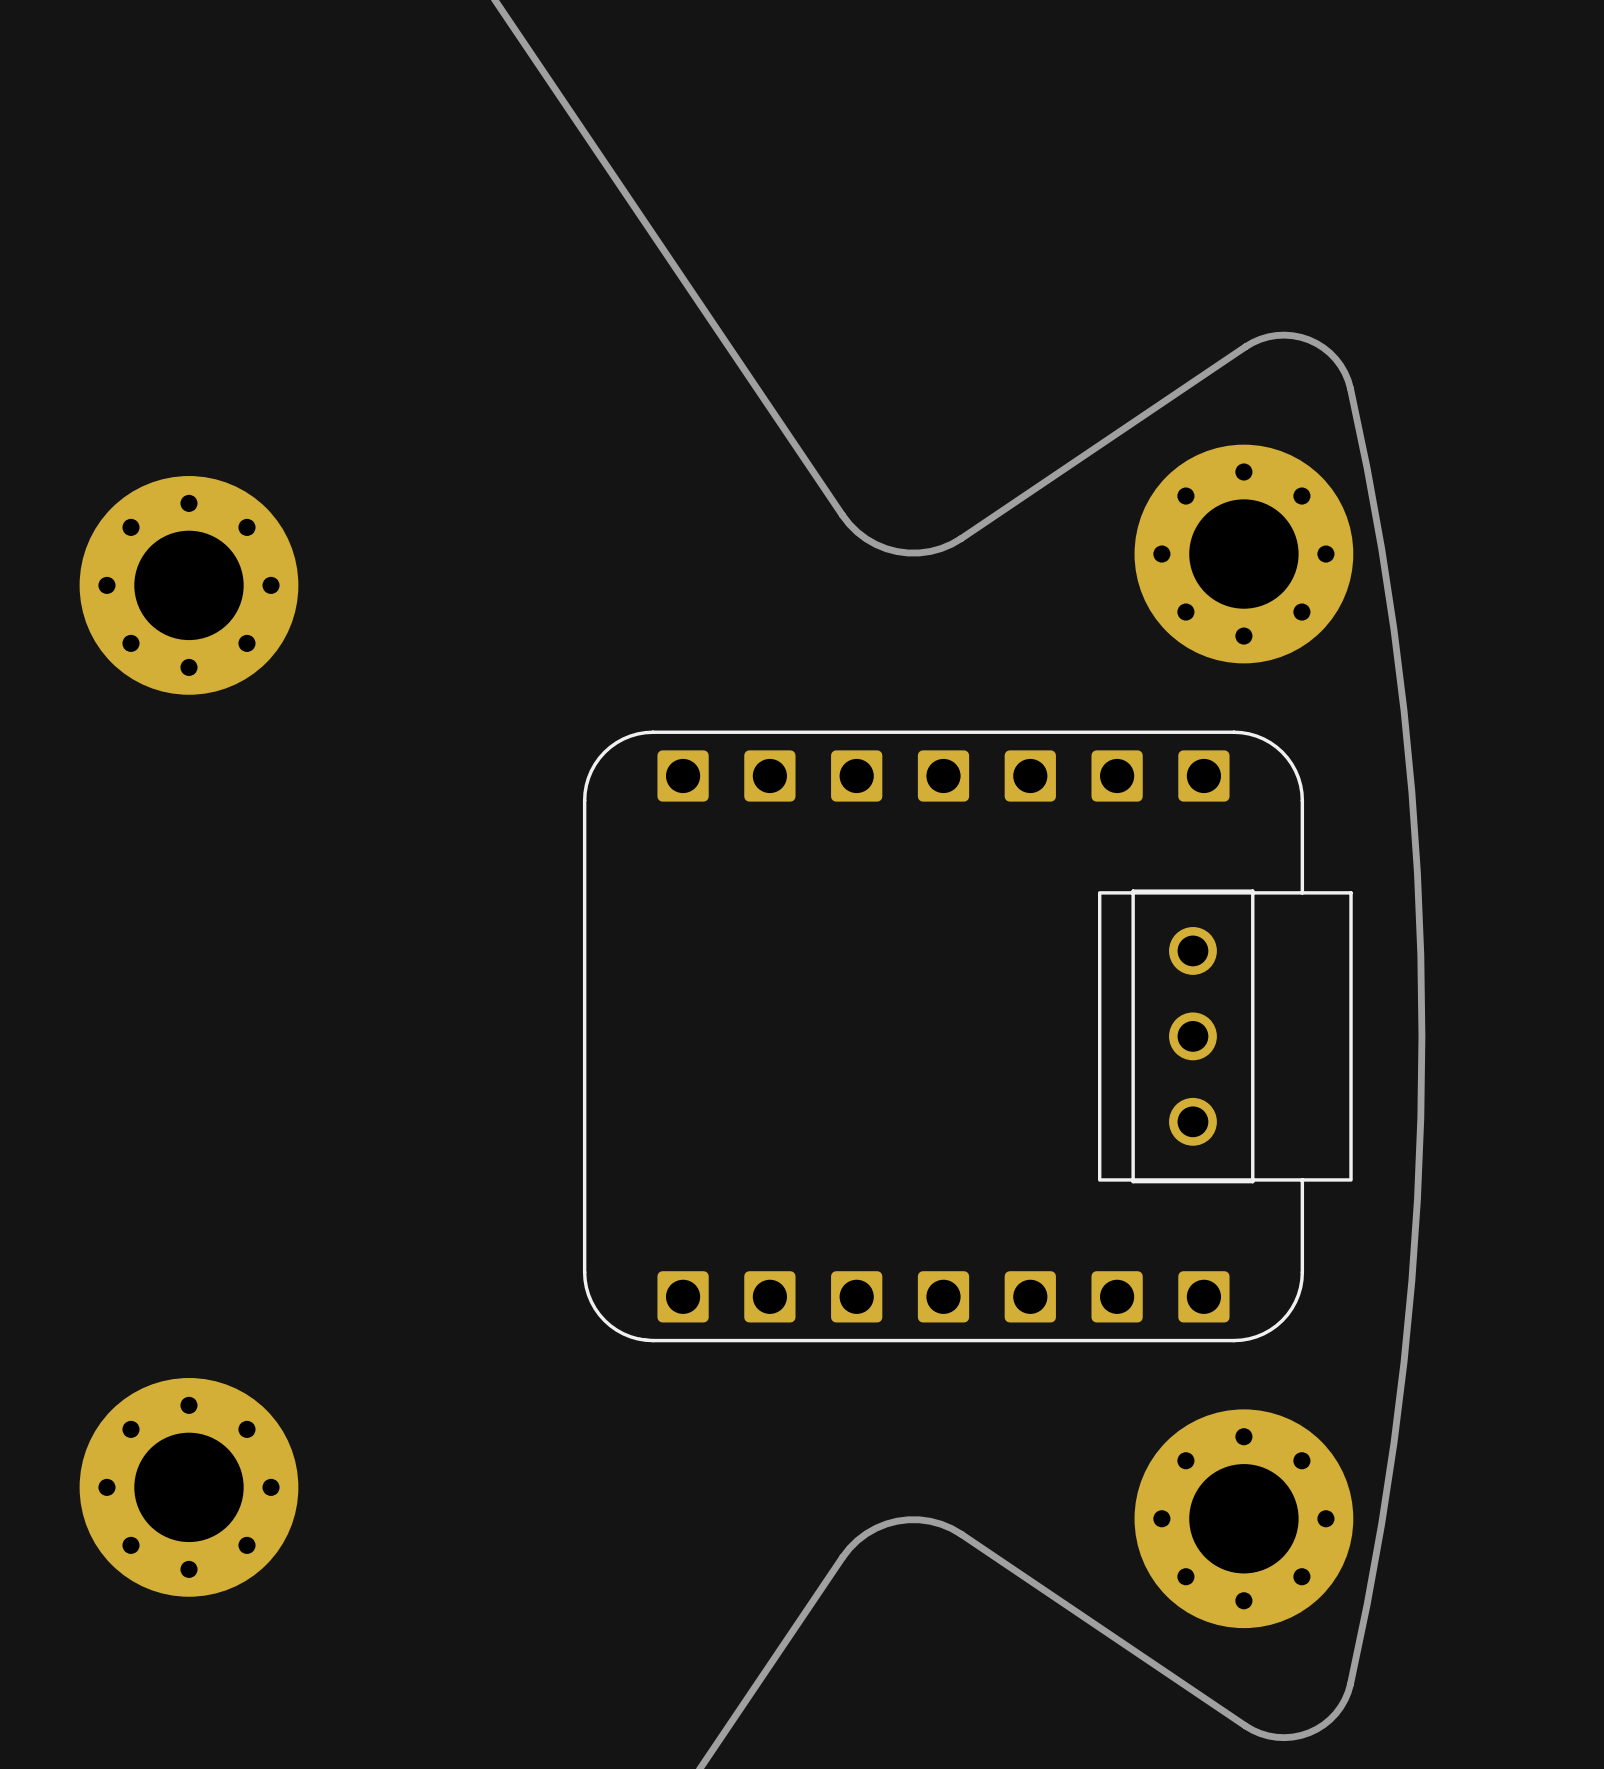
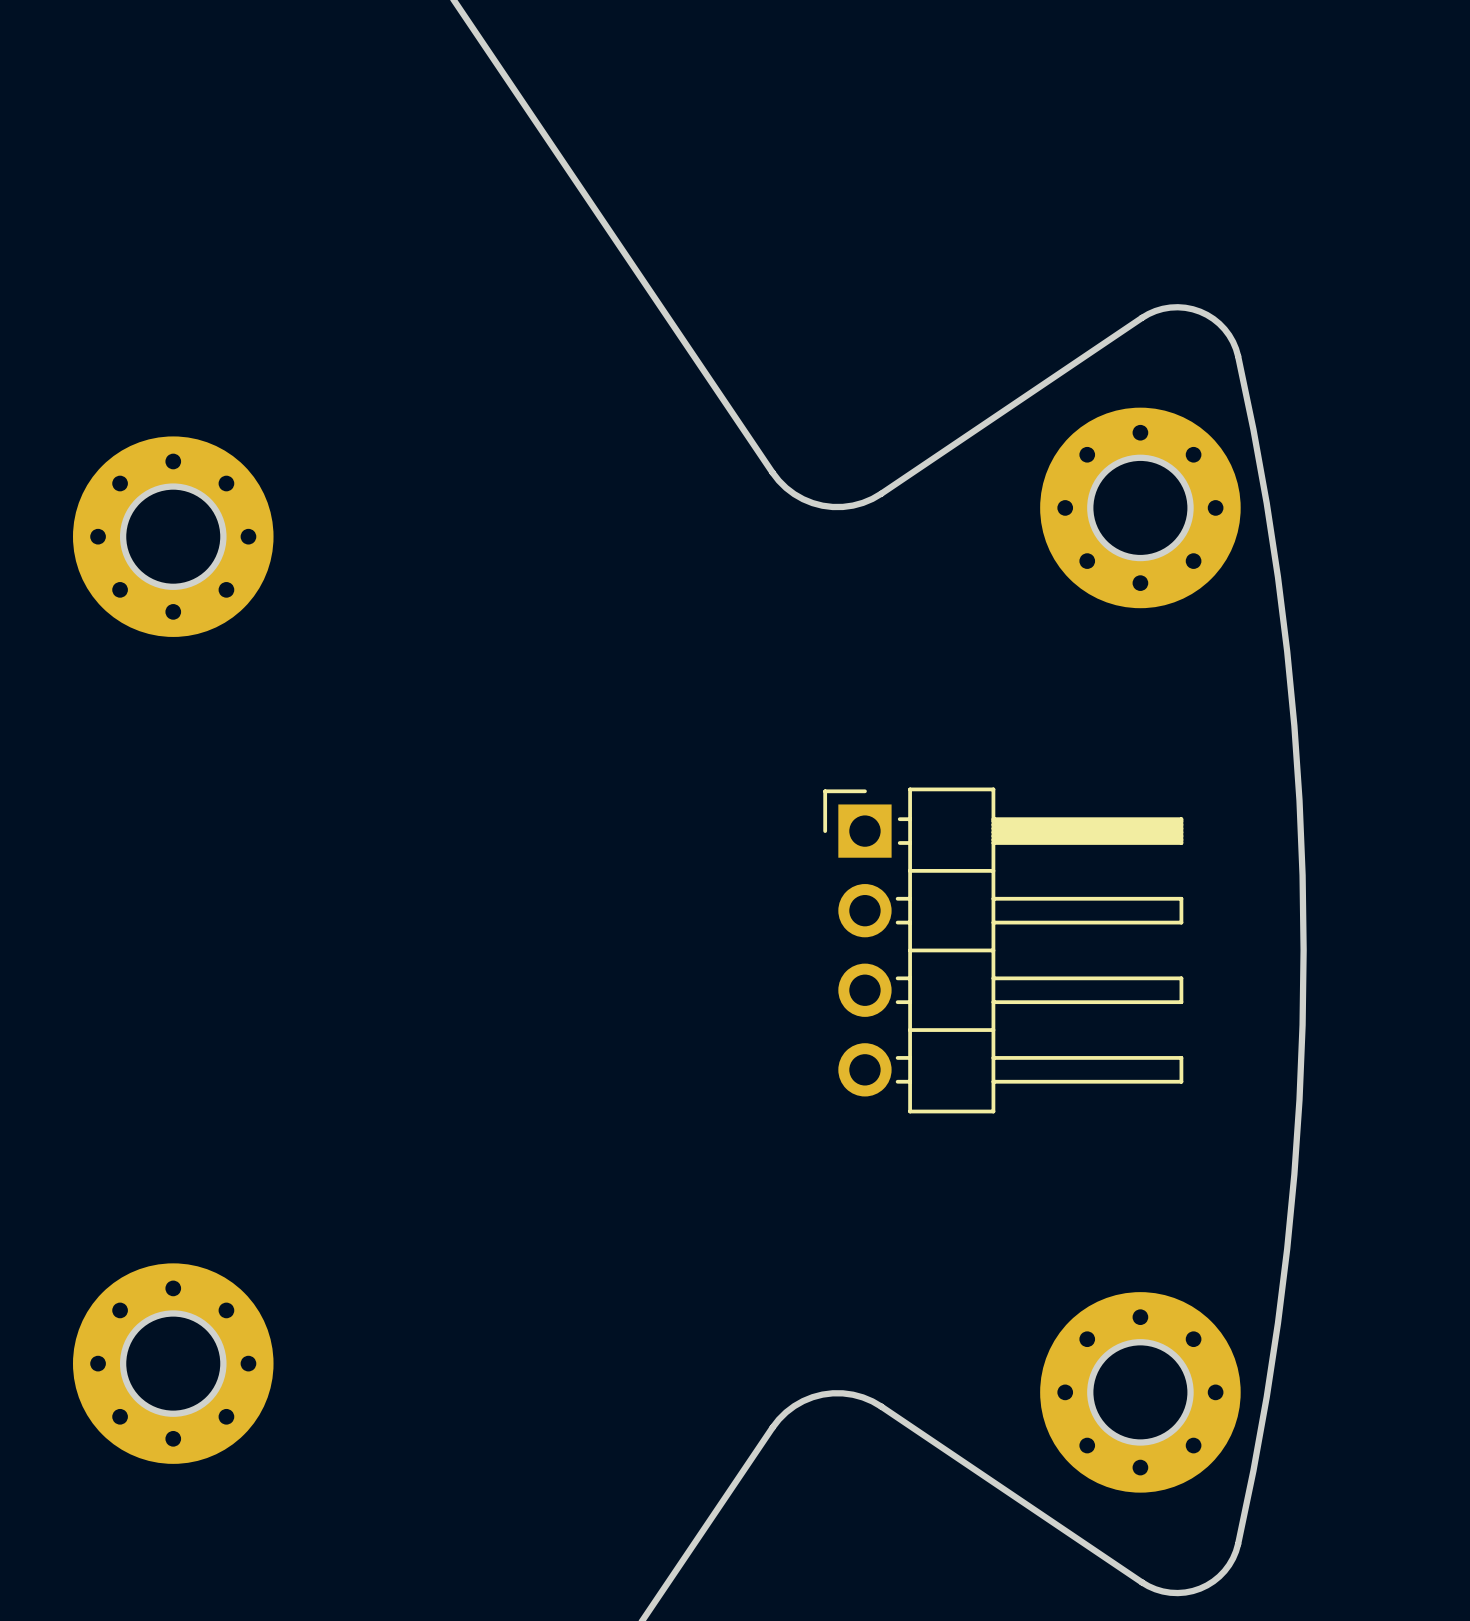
round board edge: none -> [1087, 454, 1194, 562]
round board edge: none -> [119, 483, 227, 590]
part: (967, 1036) -> none
part: none -> (1003, 950)
part: (1192, 1036) -> none
round board edge: none -> [119, 1310, 227, 1417]
round board edge: none -> [1087, 1339, 1194, 1446]

